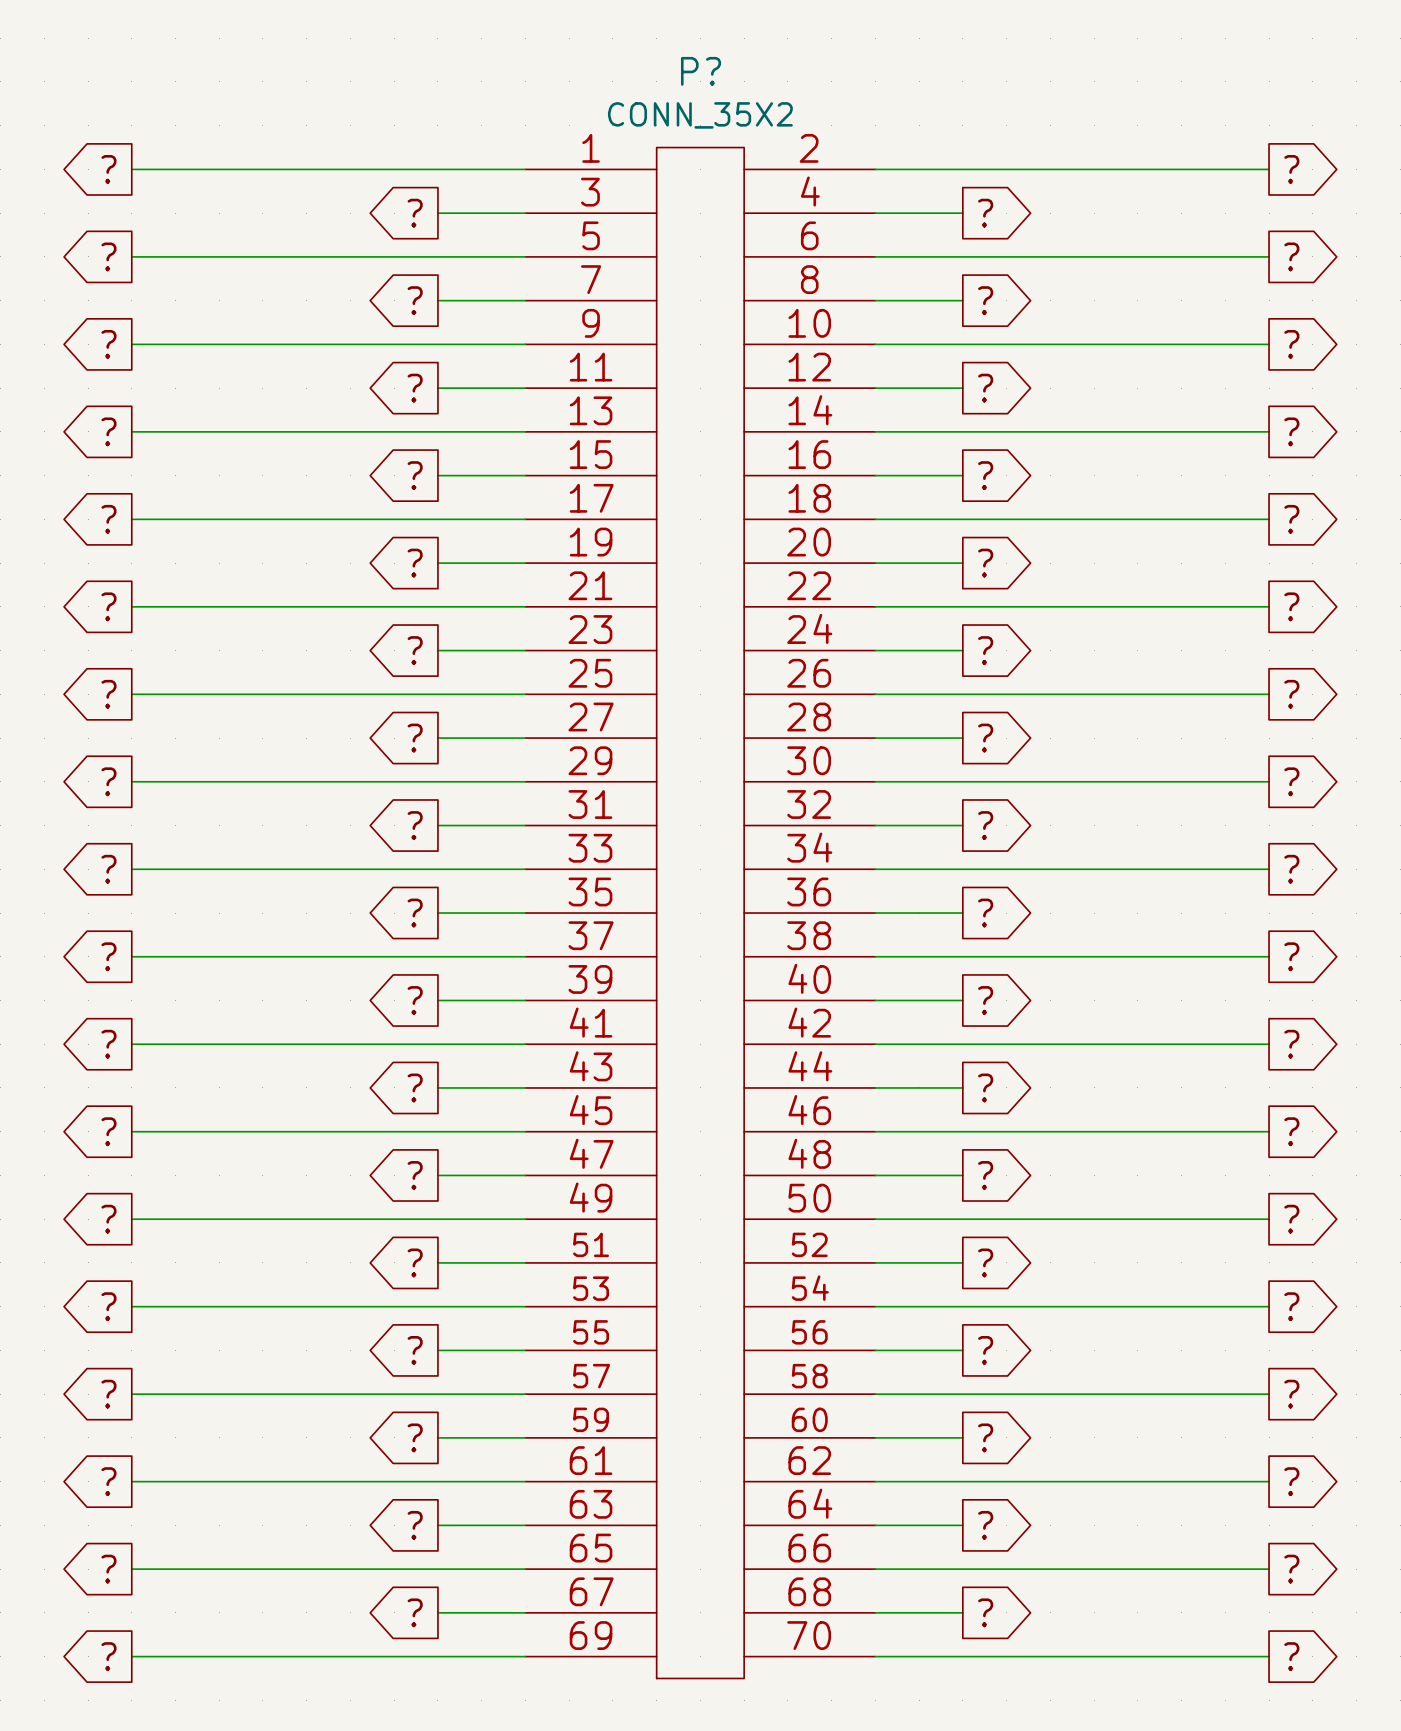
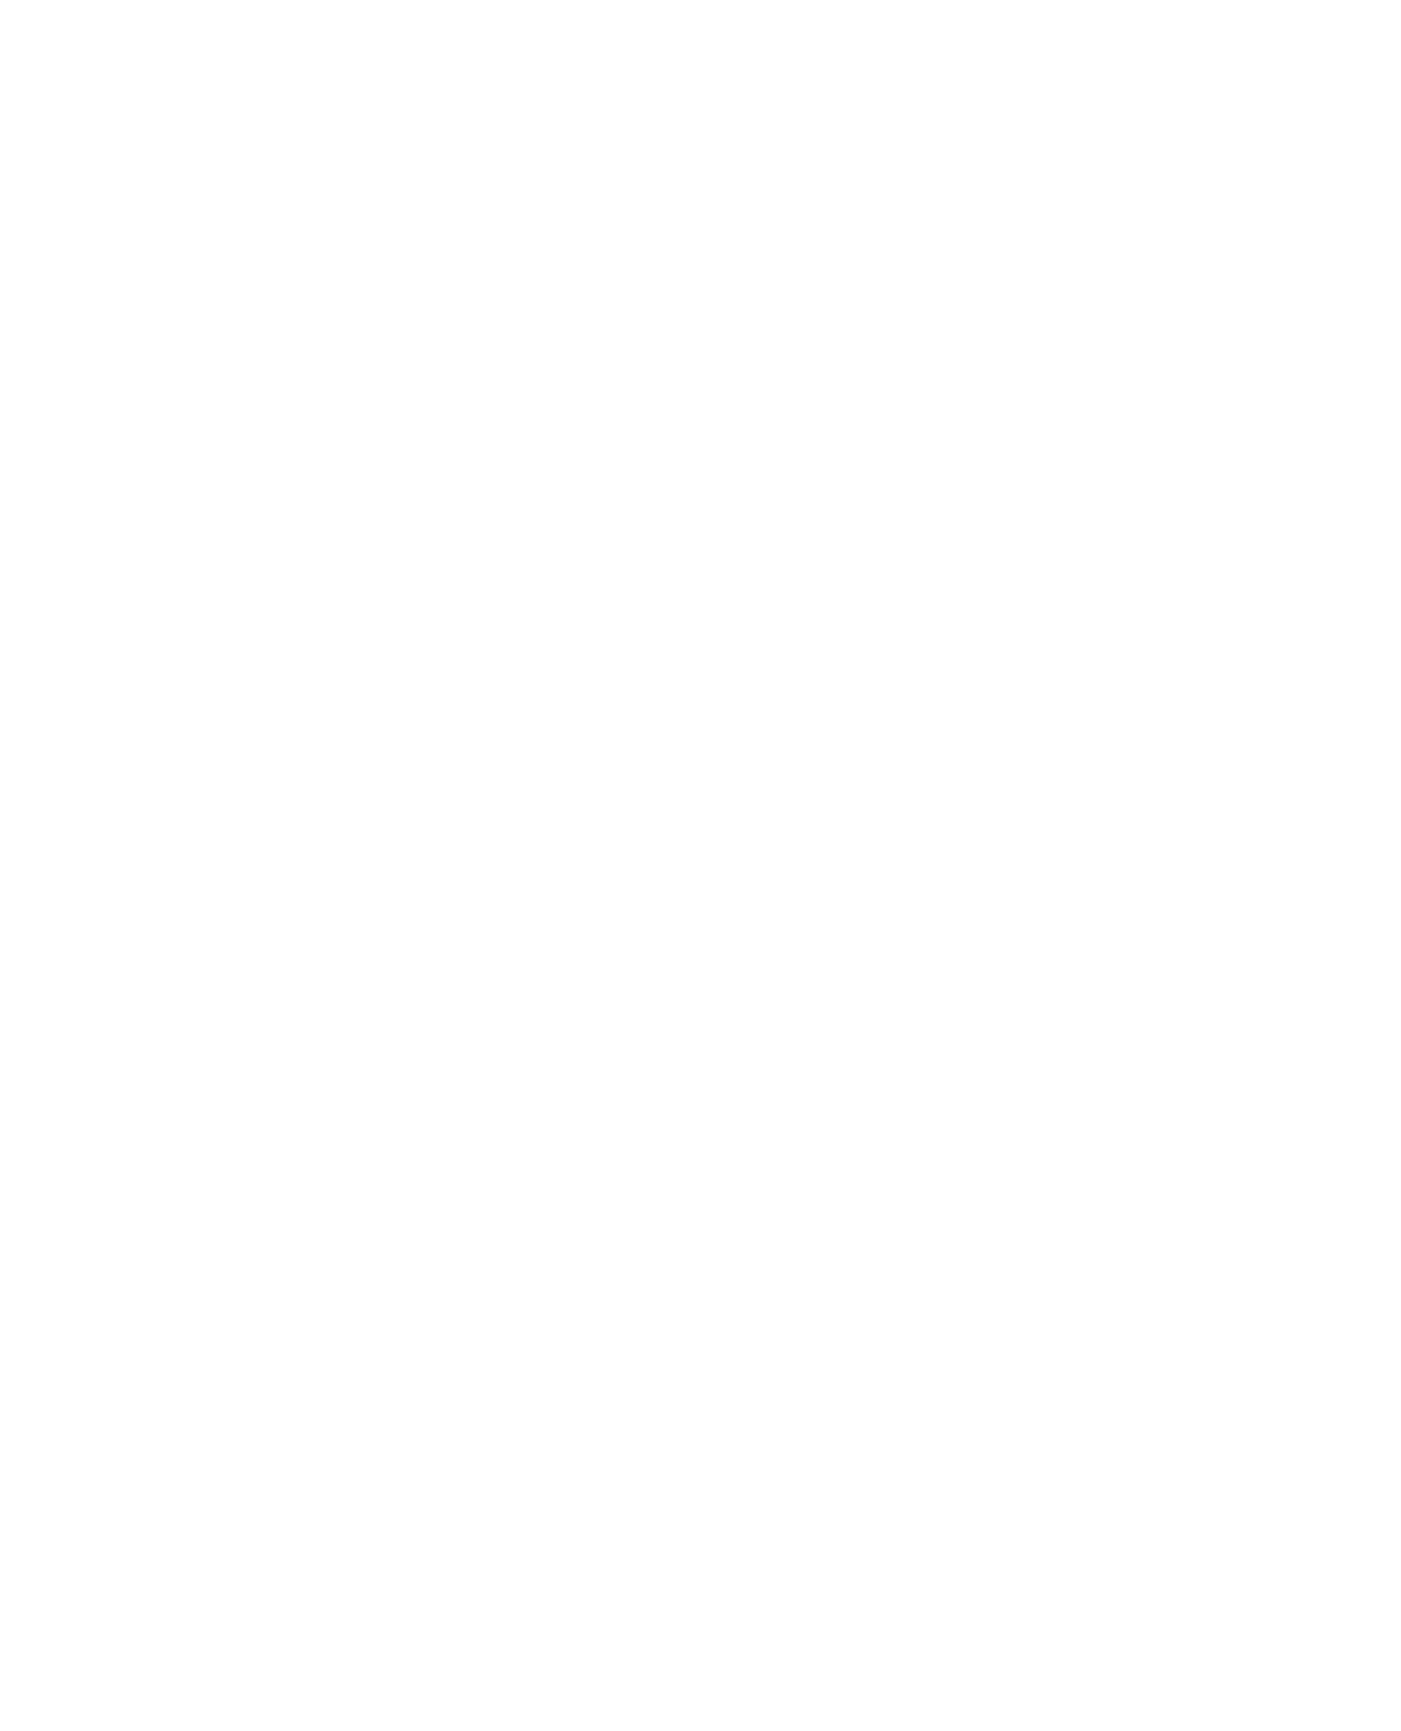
global label: ? (108, 169) -> none
wire: (131, 169) (525, 169) -> none
wire: (875, 169) (1269, 169) -> none
global label: ? (1291, 169) -> none
global label: ? (415, 213) -> none
wire: (437, 213) (525, 213) -> none
wire: (875, 213) (962, 213) -> none
global label: ? (985, 213) -> none
global label: ? (108, 256) -> none
wire: (131, 256) (525, 256) -> none
wire: (875, 256) (1269, 256) -> none
global label: ? (1291, 256) -> none
global label: ? (415, 300) -> none
wire: (437, 300) (525, 300) -> none
wire: (875, 300) (962, 300) -> none
global label: ? (985, 300) -> none
global label: ? (108, 344) -> none
wire: (131, 344) (525, 344) -> none
wire: (875, 344) (1269, 344) -> none
global label: ? (1291, 344) -> none
global label: ? (415, 388) -> none
wire: (437, 388) (525, 388) -> none
wire: (875, 388) (962, 388) -> none
global label: ? (985, 388) -> none
global label: ? (108, 431) -> none
wire: (131, 431) (525, 431) -> none
wire: (875, 431) (1269, 431) -> none
global label: ? (1291, 431) -> none
global label: ? (415, 475) -> none
wire: (437, 475) (525, 475) -> none
wire: (875, 475) (962, 475) -> none
global label: ? (985, 475) -> none
global label: ? (108, 519) -> none
wire: (131, 519) (525, 519) -> none
wire: (875, 519) (1269, 519) -> none
global label: ? (1291, 519) -> none
global label: ? (415, 563) -> none
wire: (437, 563) (525, 563) -> none
wire: (875, 563) (962, 563) -> none
global label: ? (985, 563) -> none
global label: ? (108, 606) -> none
wire: (131, 606) (525, 606) -> none
wire: (875, 606) (1269, 606) -> none
global label: ? (1291, 606) -> none
global label: ? (415, 650) -> none
wire: (437, 650) (525, 650) -> none
wire: (875, 650) (962, 650) -> none
global label: ? (985, 650) -> none
global label: ? (108, 694) -> none
wire: (131, 694) (525, 694) -> none
wire: (875, 694) (1269, 694) -> none
global label: ? (1291, 694) -> none
global label: ? (415, 738) -> none
wire: (437, 738) (525, 738) -> none
wire: (875, 738) (962, 738) -> none
global label: ? (985, 738) -> none
global label: ? (108, 781) -> none
wire: (131, 781) (525, 781) -> none
wire: (875, 781) (1269, 781) -> none
global label: ? (1291, 781) -> none
global label: ? (415, 825) -> none
wire: (437, 825) (525, 825) -> none
wire: (875, 825) (962, 825) -> none
global label: ? (985, 825) -> none
global label: ? (108, 869) -> none
wire: (131, 869) (525, 869) -> none
wire: (875, 869) (1269, 869) -> none
global label: ? (1291, 869) -> none
global label: ? (415, 913) -> none
wire: (437, 913) (525, 913) -> none
P?: CONN_35X2 (700, 913) -> none
wire: (875, 913) (962, 913) -> none
global label: ? (985, 913) -> none
global label: ? (108, 956) -> none
wire: (131, 956) (525, 956) -> none
wire: (875, 956) (1269, 956) -> none
global label: ? (1291, 956) -> none
global label: ? (415, 1000) -> none
wire: (437, 1000) (525, 1000) -> none
wire: (875, 1000) (962, 1000) -> none
global label: ? (985, 1000) -> none
global label: ? (108, 1044) -> none
wire: (131, 1044) (525, 1044) -> none
wire: (875, 1044) (1269, 1044) -> none
global label: ? (1291, 1044) -> none
global label: ? (415, 1087) -> none
wire: (437, 1087) (525, 1087) -> none
wire: (875, 1087) (962, 1087) -> none
global label: ? (985, 1087) -> none
global label: ? (108, 1131) -> none
wire: (131, 1131) (525, 1131) -> none
wire: (875, 1131) (1269, 1131) -> none
global label: ? (1291, 1131) -> none
global label: ? (415, 1175) -> none
wire: (437, 1175) (525, 1175) -> none
wire: (875, 1175) (962, 1175) -> none
global label: ? (985, 1175) -> none
global label: ? (108, 1219) -> none
wire: (131, 1219) (525, 1219) -> none
wire: (875, 1219) (1269, 1219) -> none
global label: ? (1291, 1219) -> none
global label: ? (415, 1262) -> none
wire: (437, 1262) (525, 1262) -> none
wire: (875, 1262) (962, 1262) -> none
global label: ? (985, 1262) -> none
global label: ? (108, 1306) -> none
wire: (131, 1306) (525, 1306) -> none
wire: (875, 1306) (1269, 1306) -> none
global label: ? (1291, 1306) -> none
global label: ? (415, 1350) -> none
wire: (437, 1350) (525, 1350) -> none
wire: (875, 1350) (962, 1350) -> none
global label: ? (985, 1350) -> none
global label: ? (108, 1394) -> none
wire: (131, 1394) (525, 1394) -> none
wire: (875, 1394) (1269, 1394) -> none
global label: ? (1291, 1394) -> none
global label: ? (415, 1437) -> none
wire: (437, 1437) (525, 1437) -> none
wire: (875, 1437) (962, 1437) -> none
global label: ? (985, 1437) -> none
global label: ? (108, 1481) -> none
wire: (131, 1481) (525, 1481) -> none
wire: (875, 1481) (1269, 1481) -> none
global label: ? (1291, 1481) -> none
global label: ? (415, 1525) -> none
wire: (437, 1525) (525, 1525) -> none
wire: (875, 1525) (962, 1525) -> none
global label: ? (985, 1525) -> none
global label: ? (108, 1569) -> none
wire: (131, 1569) (525, 1569) -> none
wire: (875, 1569) (1269, 1569) -> none
global label: ? (1291, 1569) -> none
global label: ? (415, 1612) -> none
wire: (437, 1612) (525, 1612) -> none
wire: (875, 1612) (962, 1612) -> none
global label: ? (985, 1612) -> none
global label: ? (108, 1656) -> none
wire: (131, 1656) (525, 1656) -> none
wire: (875, 1656) (1269, 1656) -> none
global label: ? (1291, 1656) -> none

